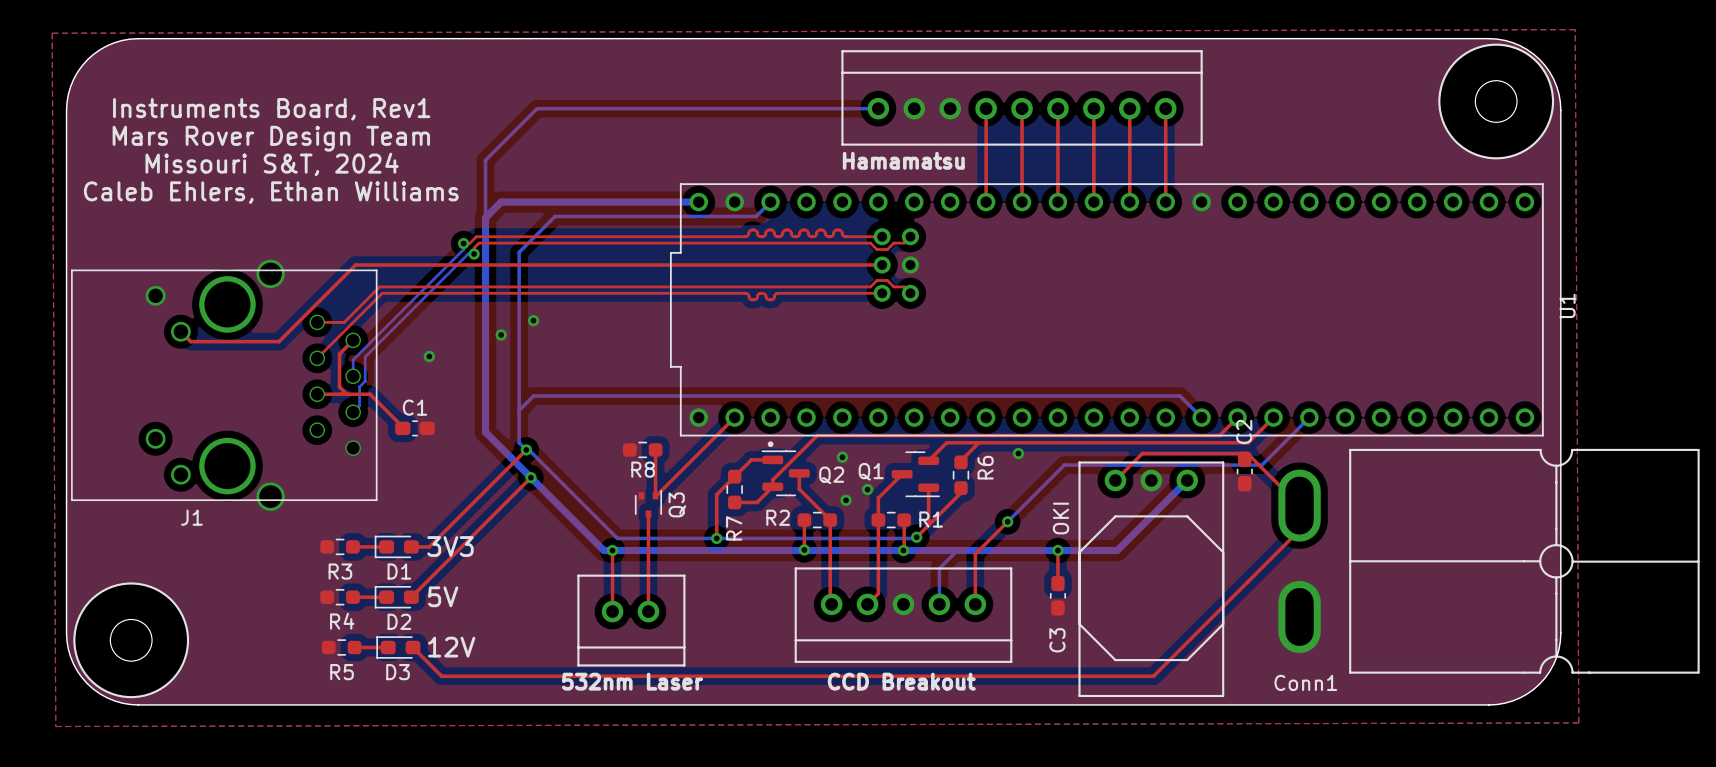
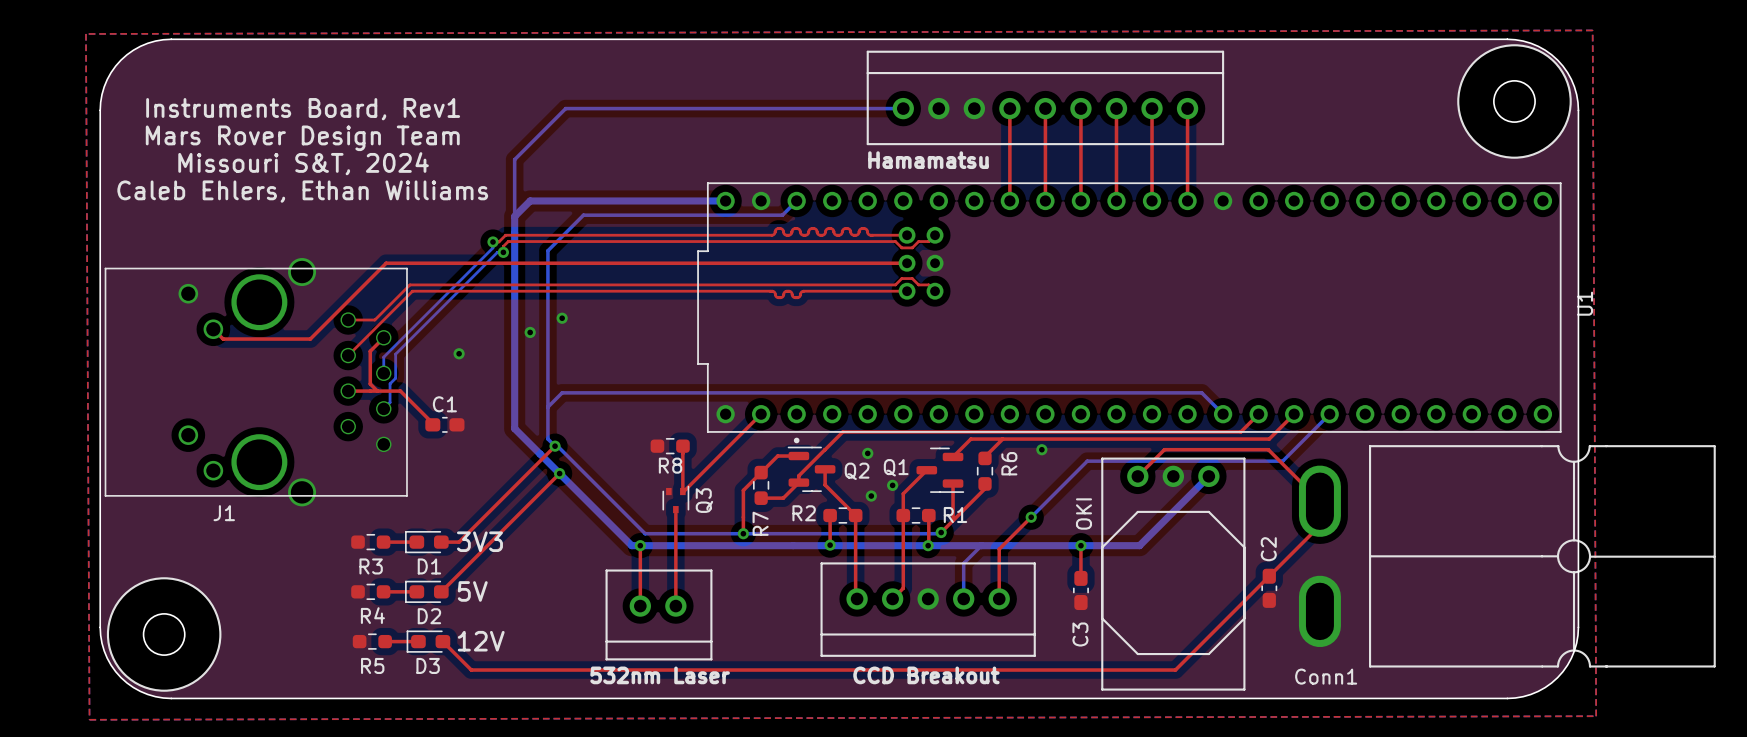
C2 position: (1244, 471) -> (1269, 588)

